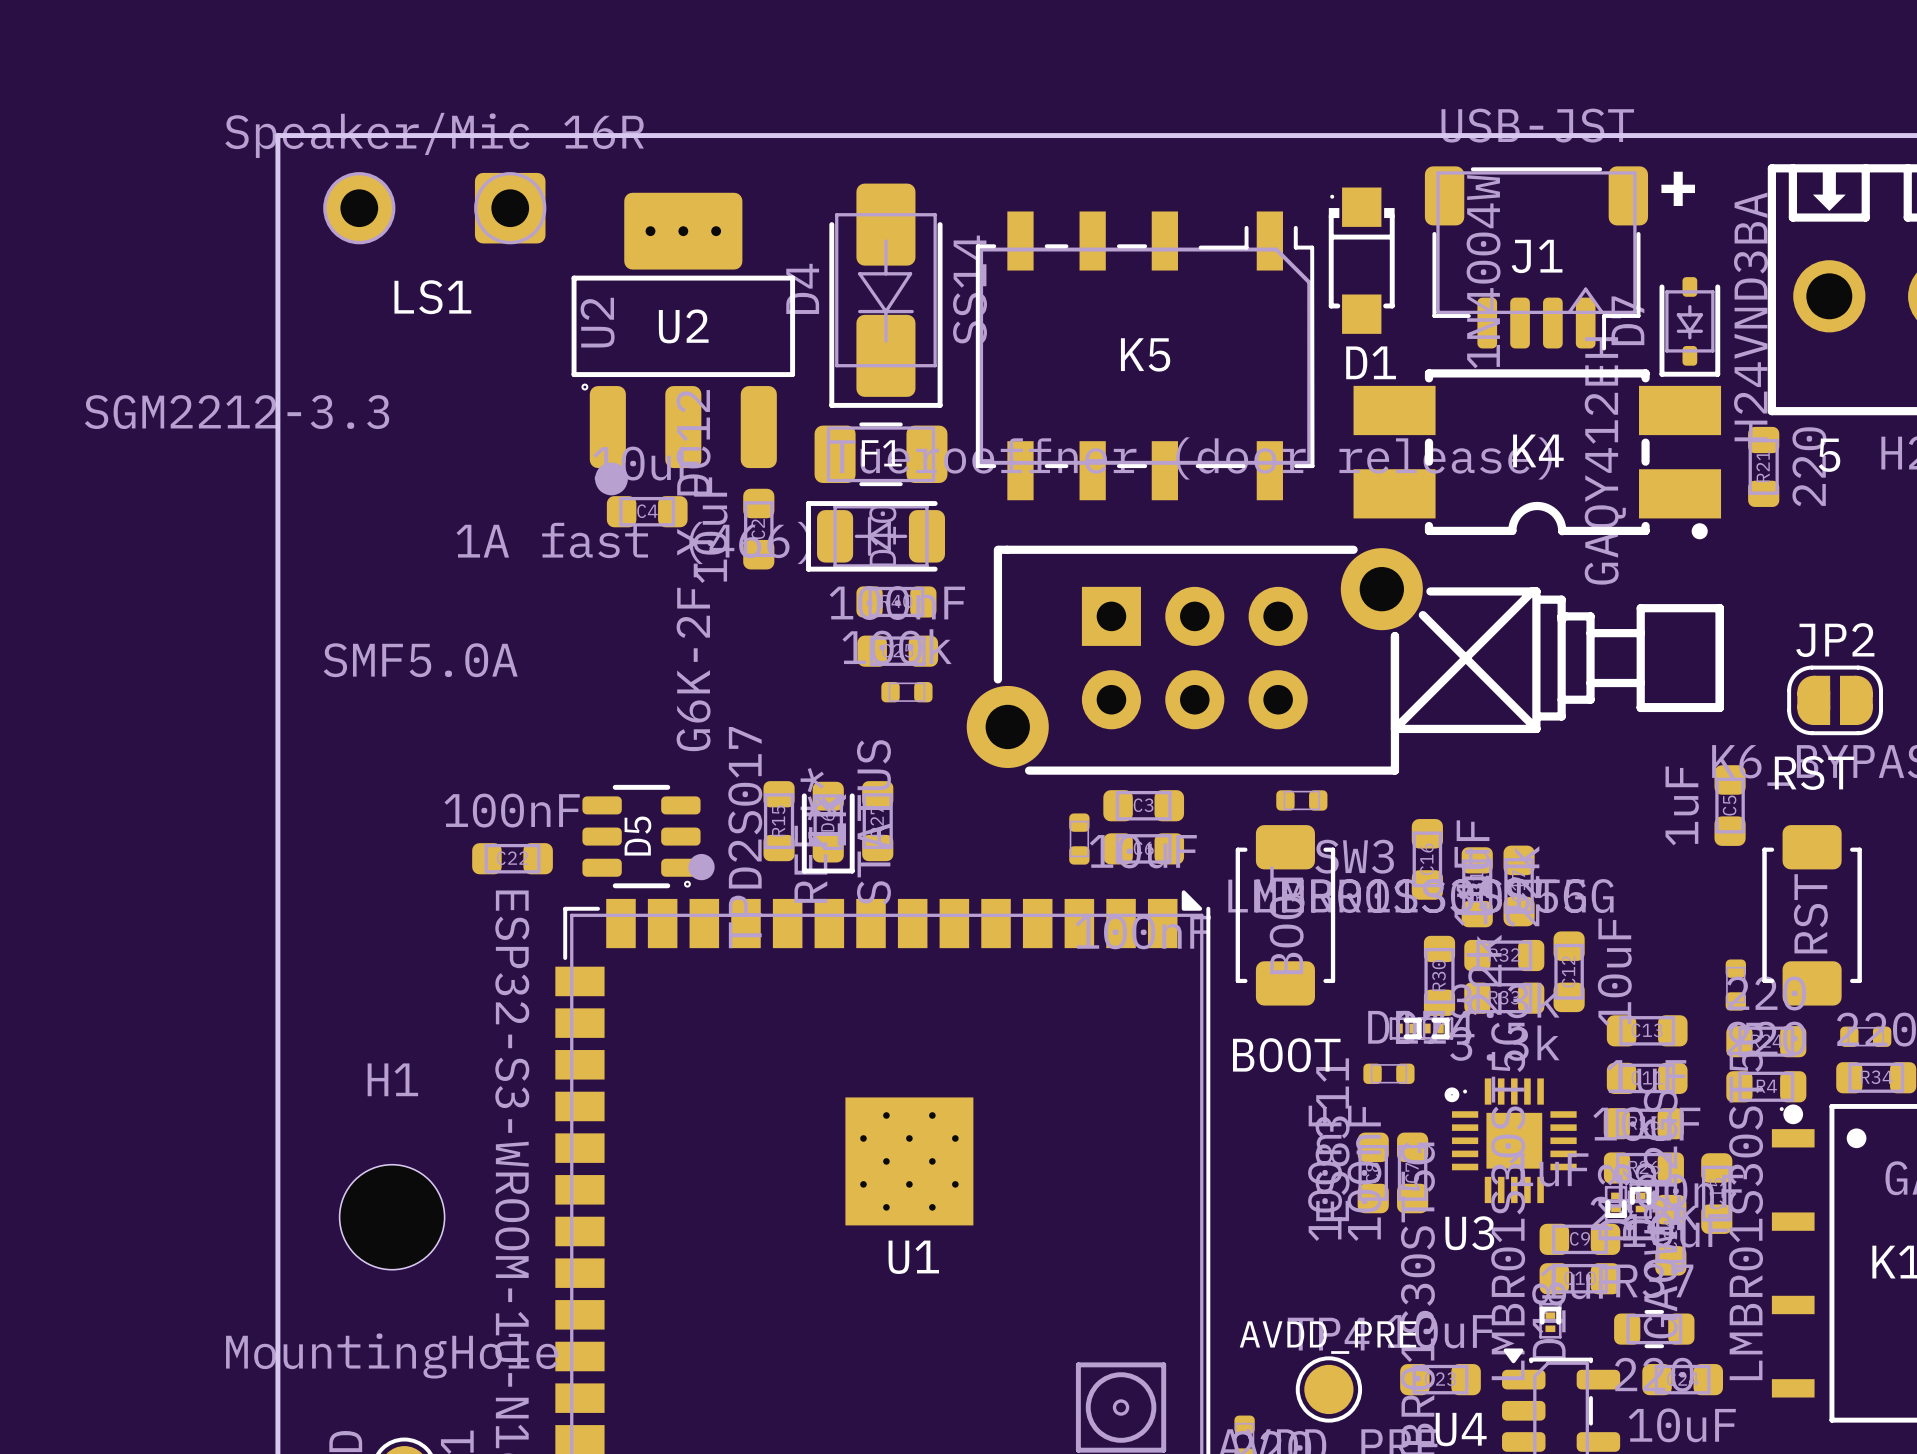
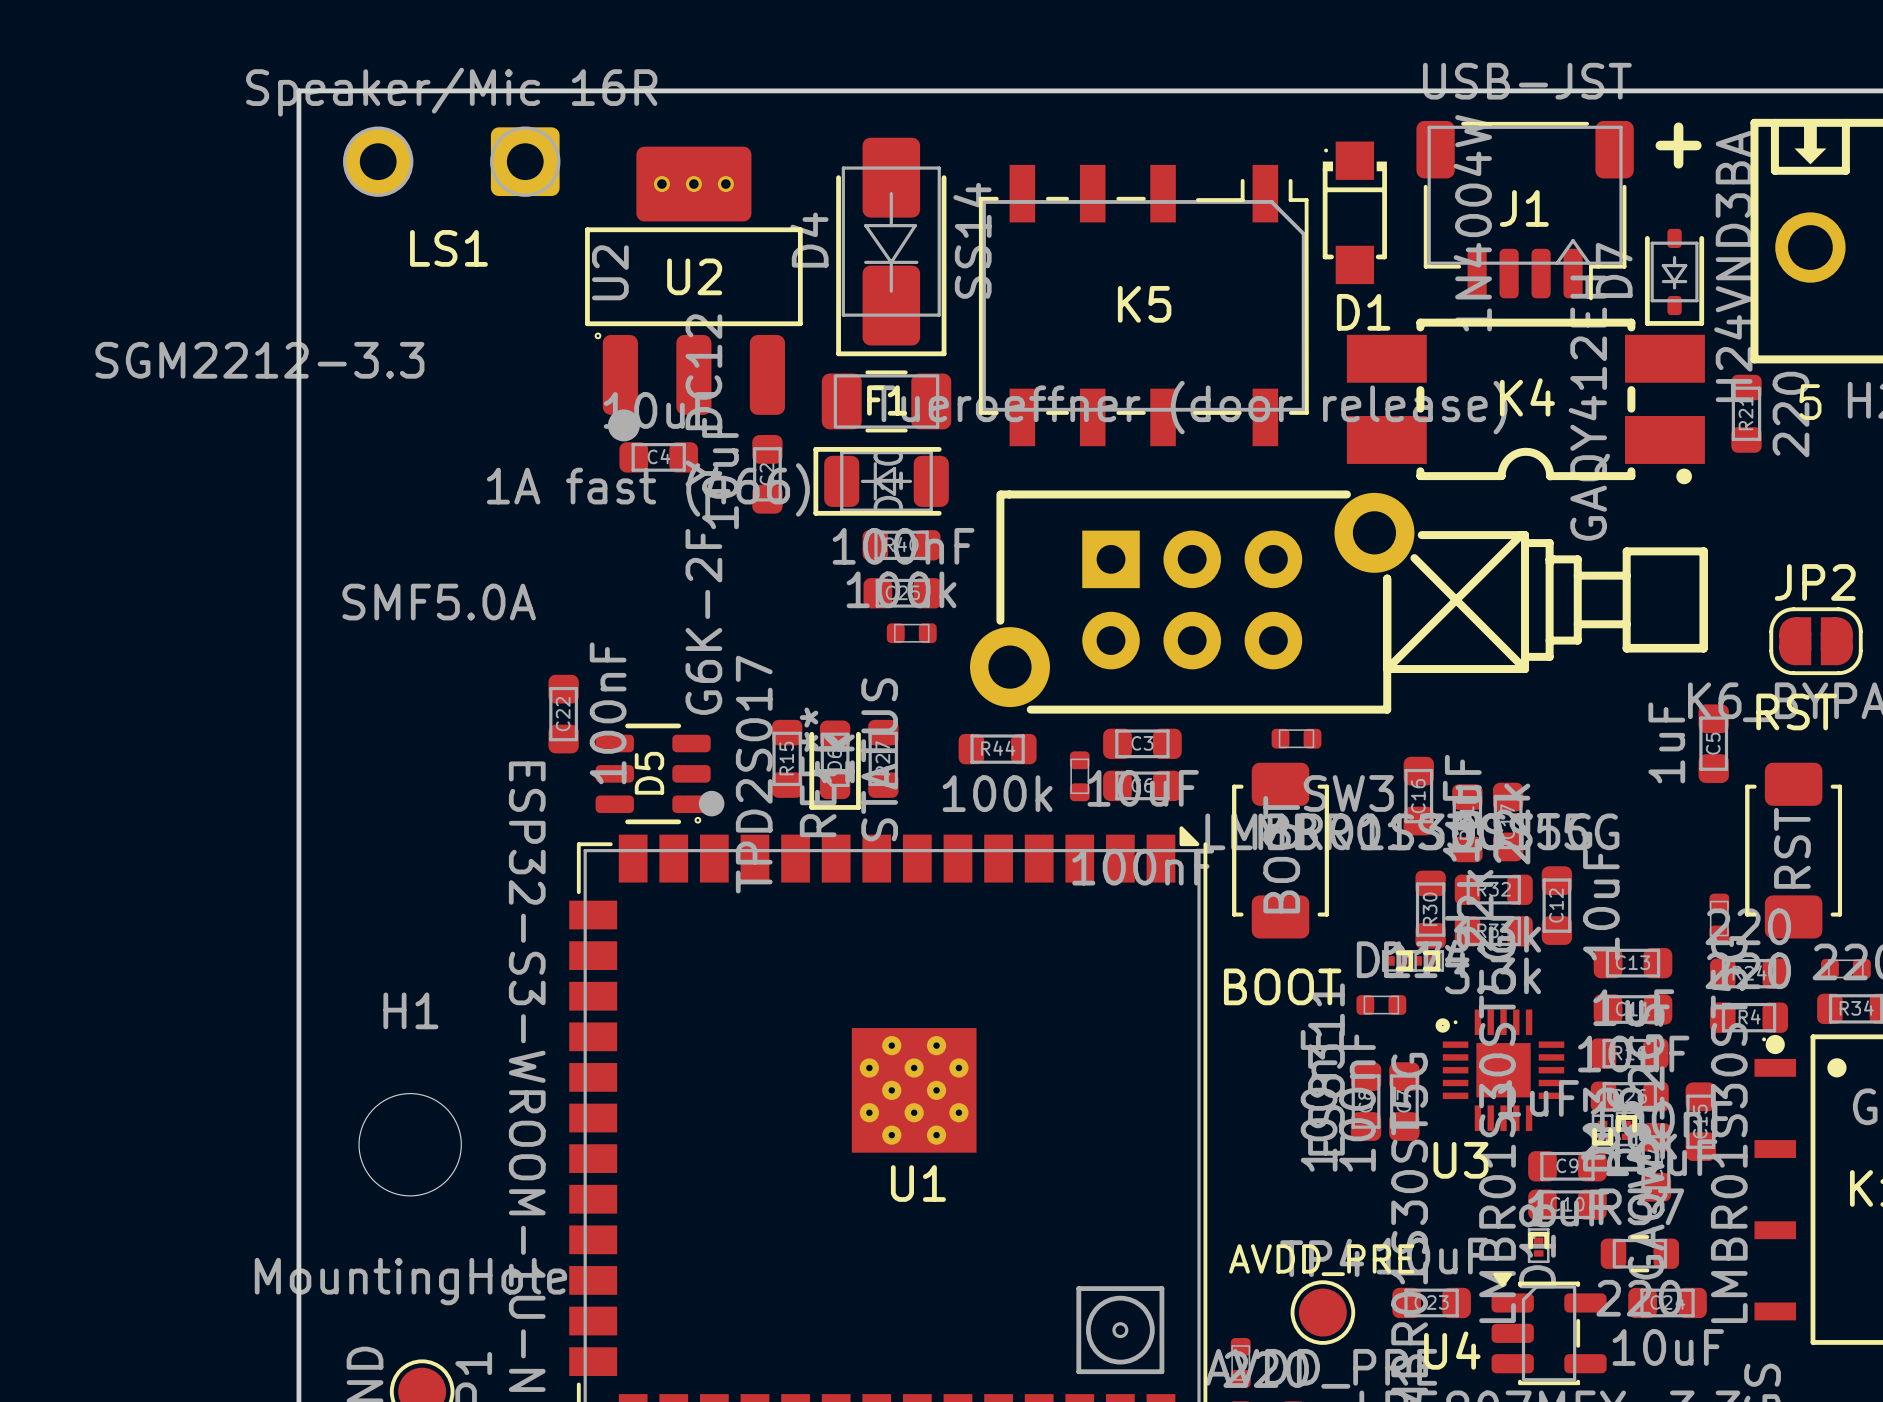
R44: none -> 100k (997, 749)
C22 rotation: 0° (512, 858) -> 90° clockwise (563, 714)
C22 position: (512, 858) -> (563, 714)

